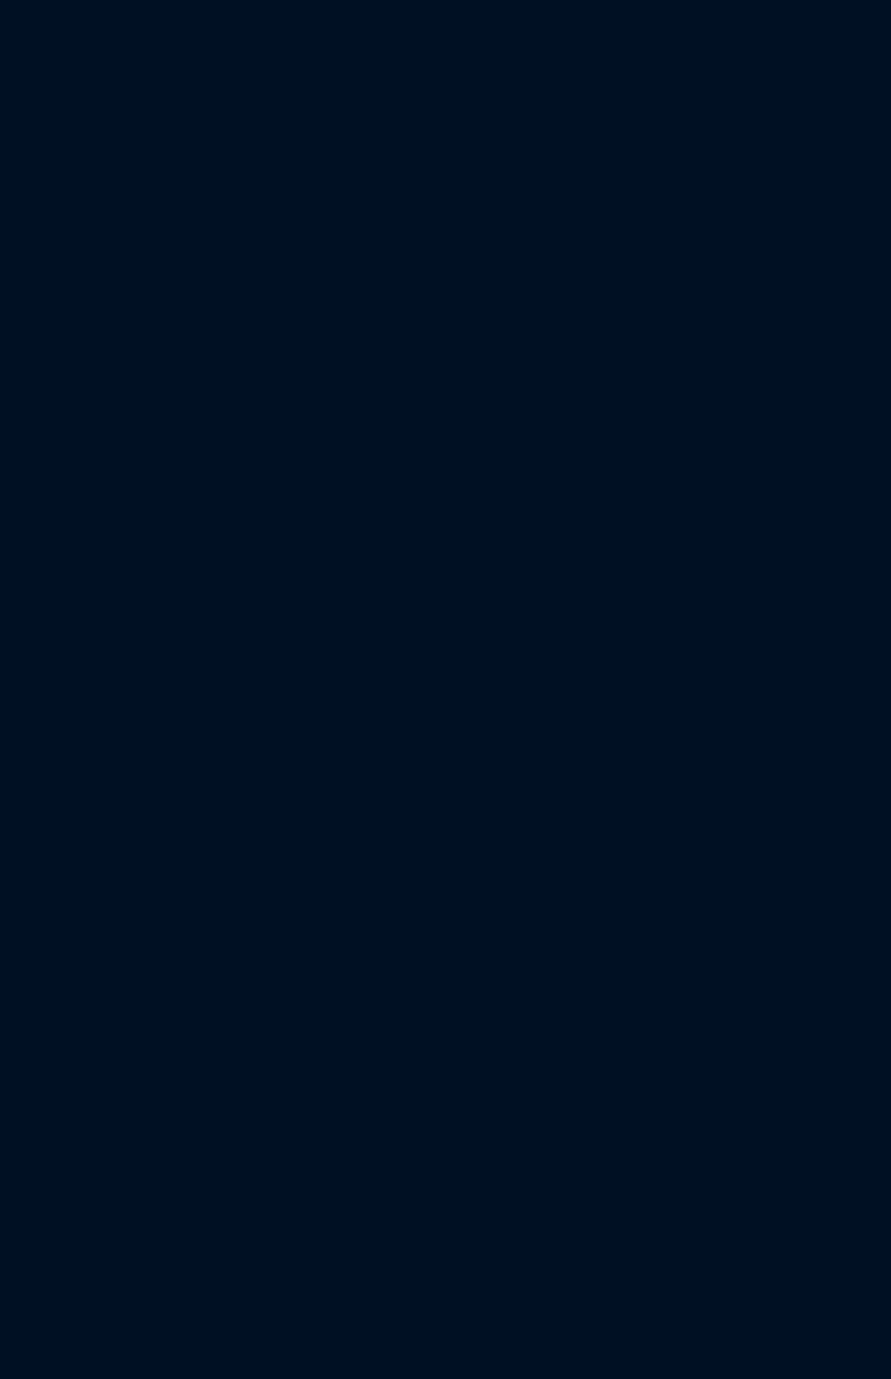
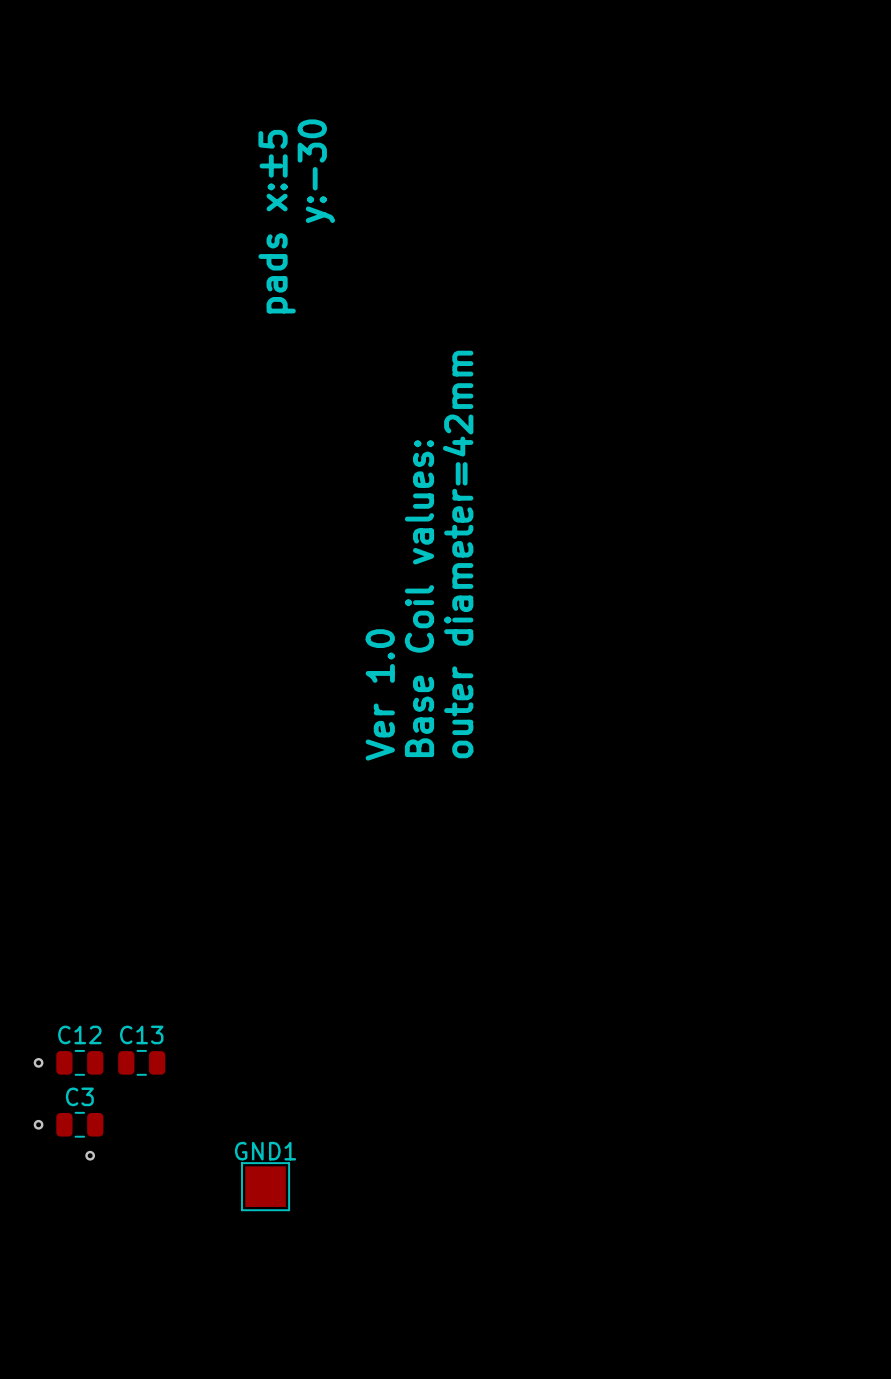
text: none -> y:-30 (316, 171)
text: none -> pads x:±5 (277, 221)
text: none -> outer diameter=42mm (458, 554)
text: none -> Base Coil values: (419, 598)
text: none -> Ver 1.0 (380, 694)
via: none -> (38, 1062)
C12: none -> (79, 1062)
C13: none -> (141, 1062)
via: none -> (38, 1124)
C3: none -> (79, 1124)
via: none -> (90, 1155)
GND1: none -> (265, 1186)

